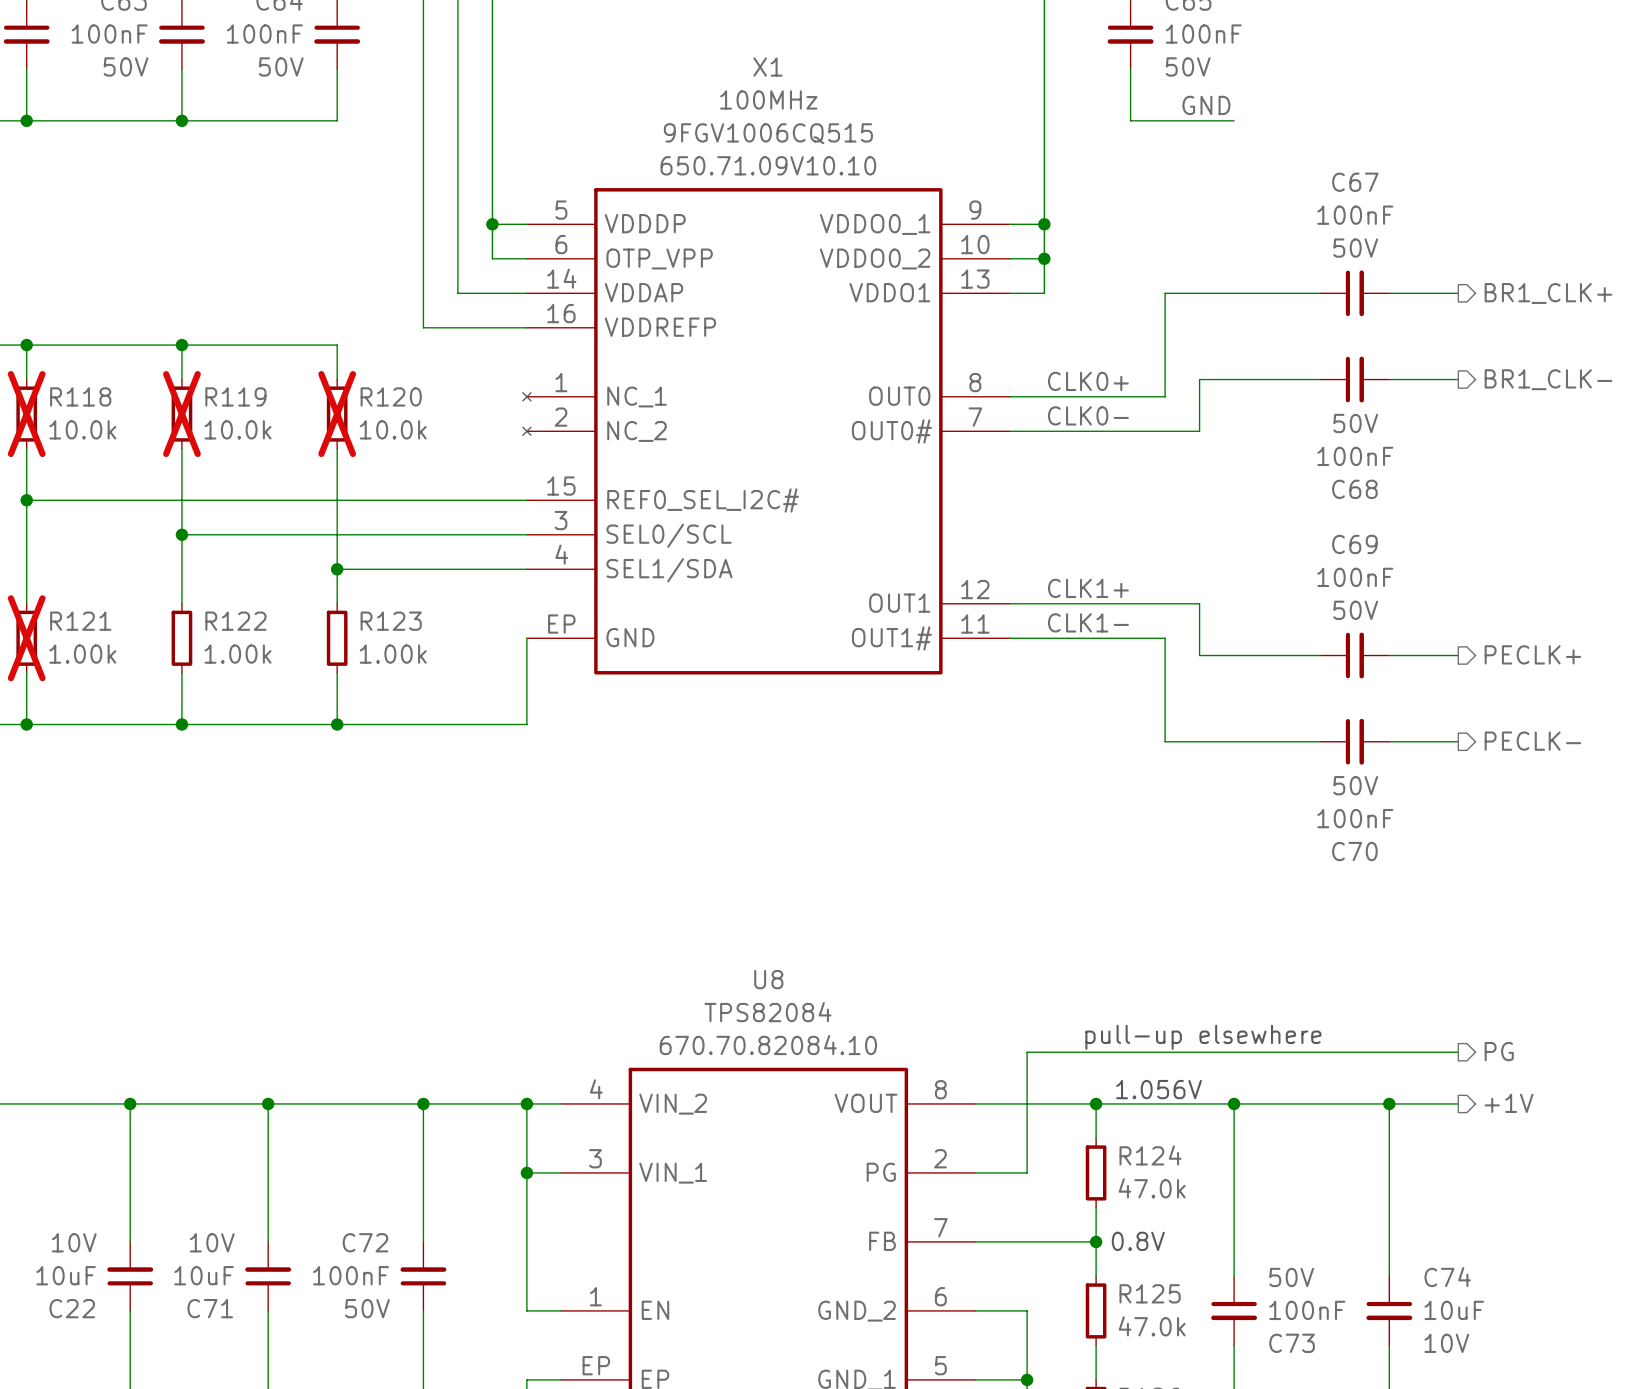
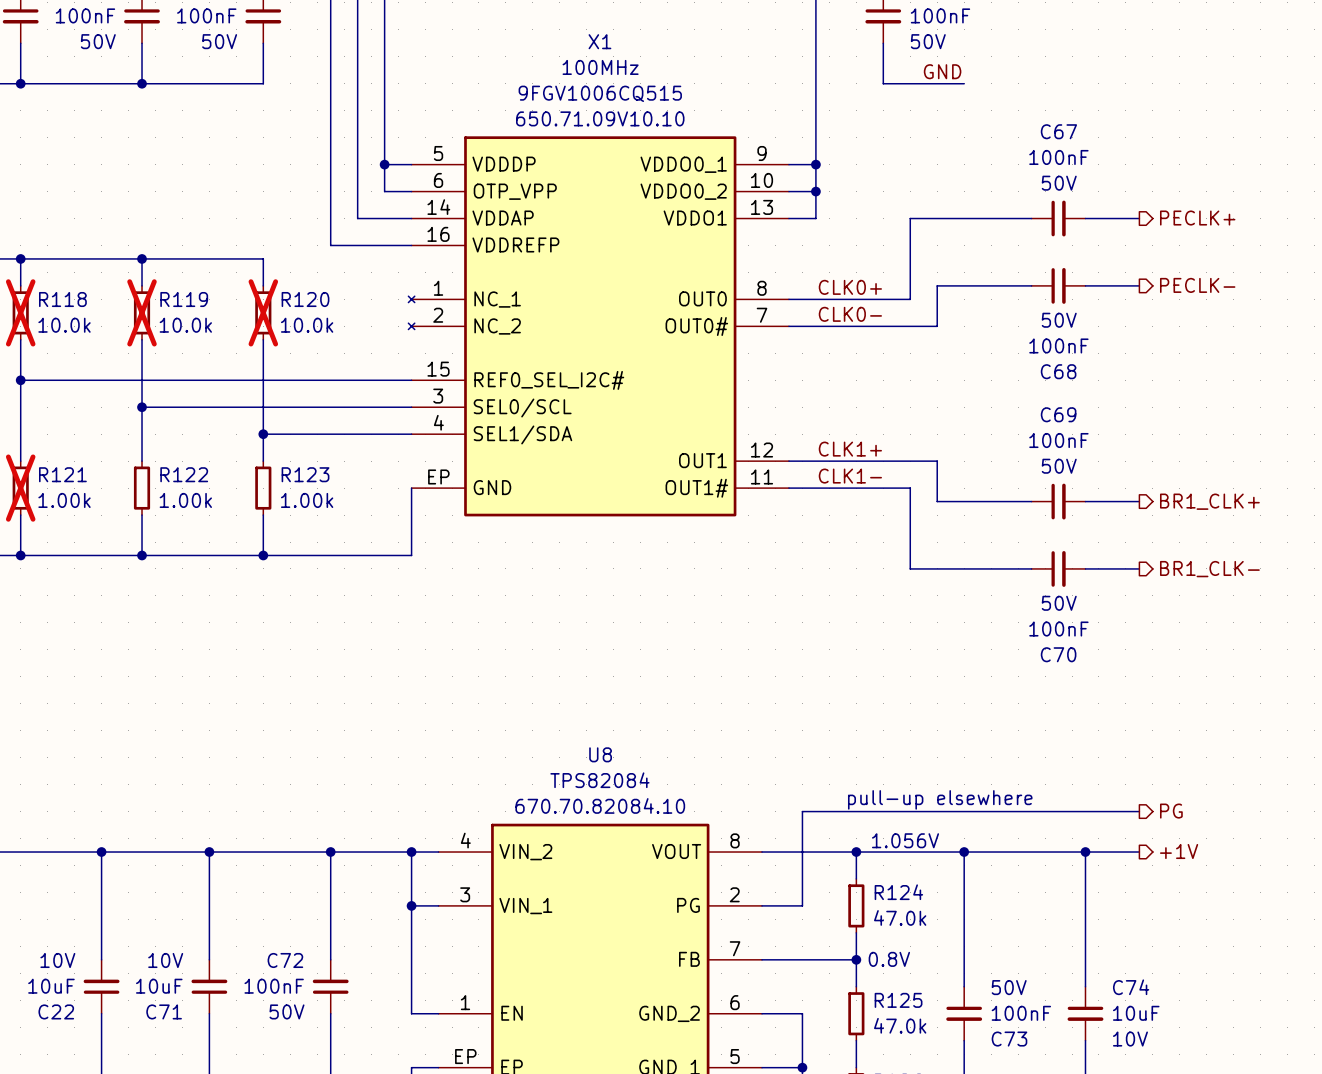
hierarchical label: BR1_CLK+ (1548, 293) -> PECLK+ (1197, 218)
hierarchical label: BR1_CLK- (1548, 379) -> PECLK- (1197, 285)
hierarchical label: PECLK+ (1532, 654) -> BR1_CLK+ (1209, 501)
hierarchical label: PECLK- (1532, 741) -> BR1_CLK- (1209, 569)

